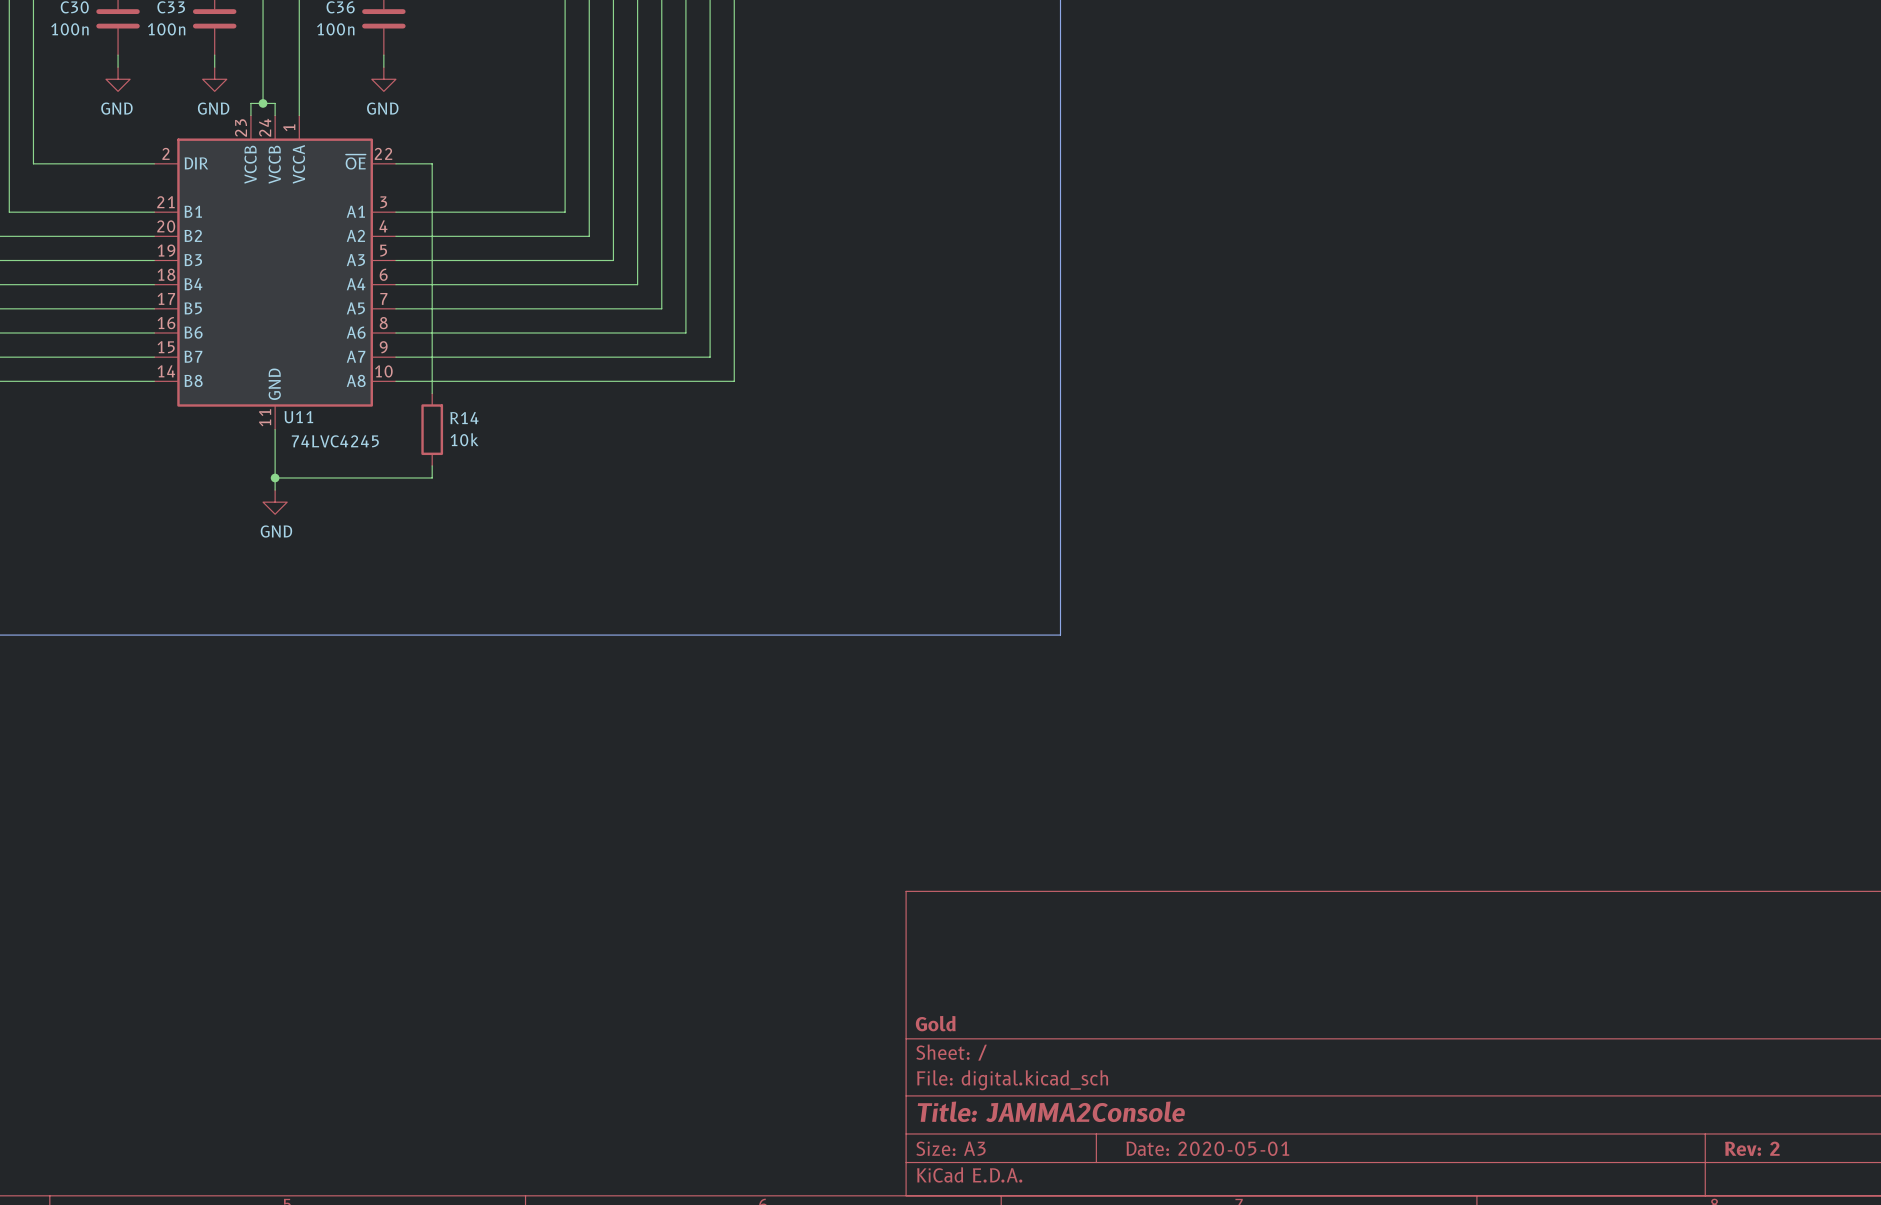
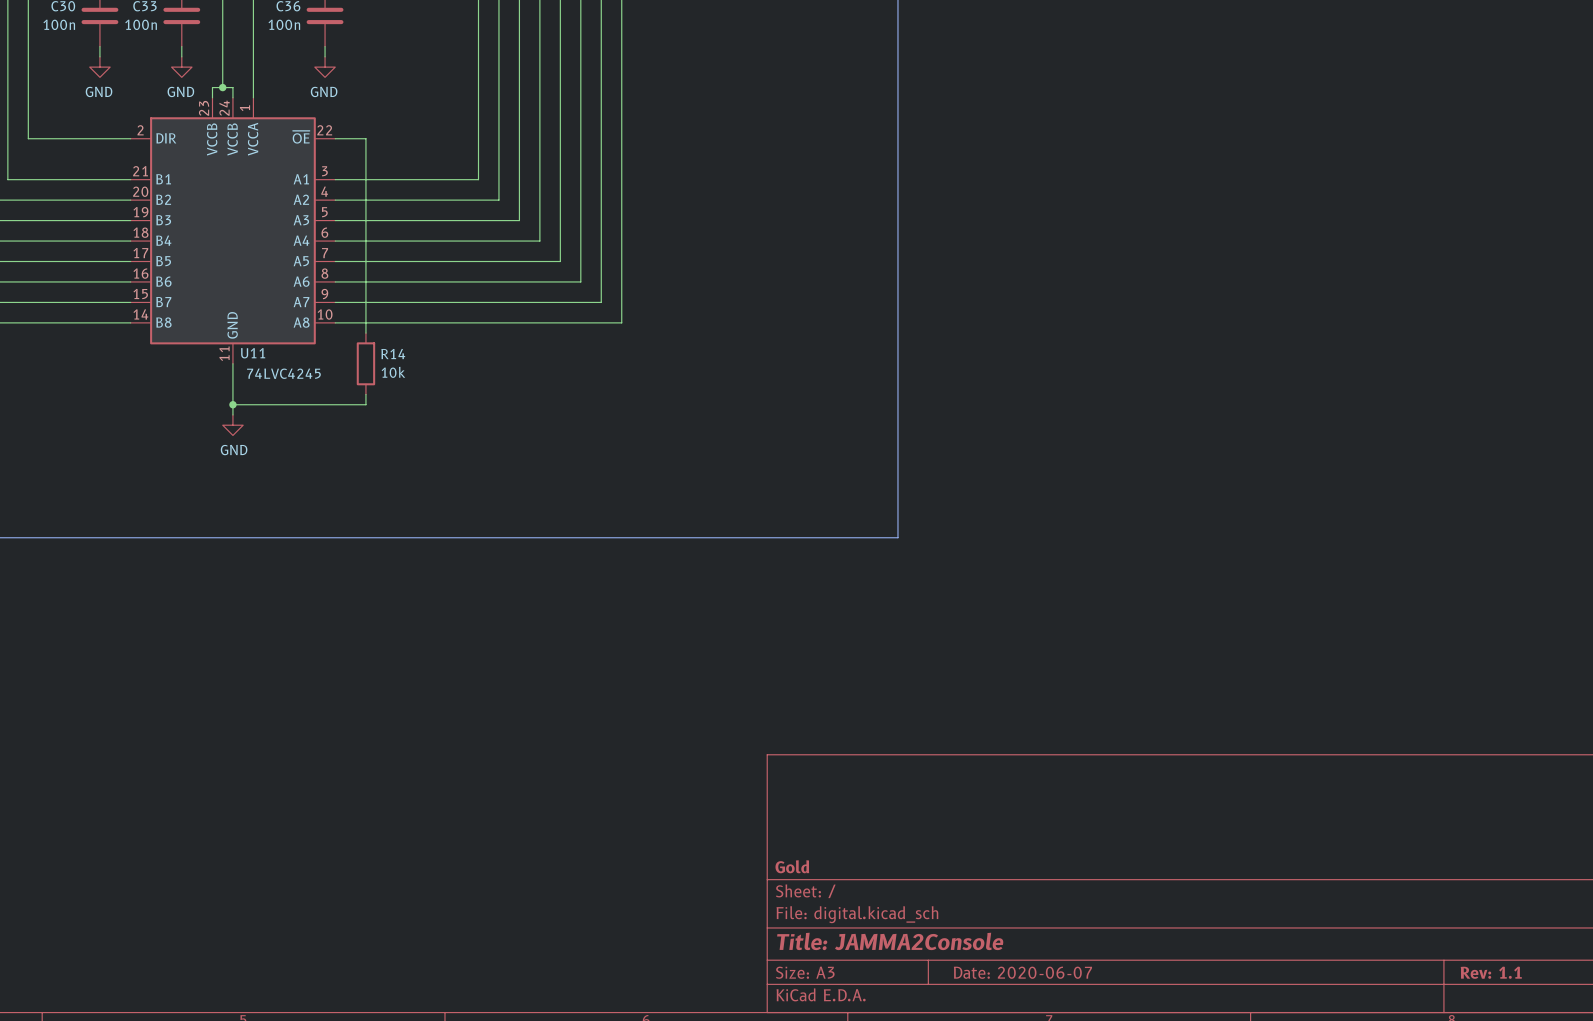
title block: Date: 2020-05-01 (1207, 1148) -> Date: 2020-06-07 (1022, 972)
title block: Rev: 2 (1752, 1148) -> Rev: 1.1 (1491, 972)

